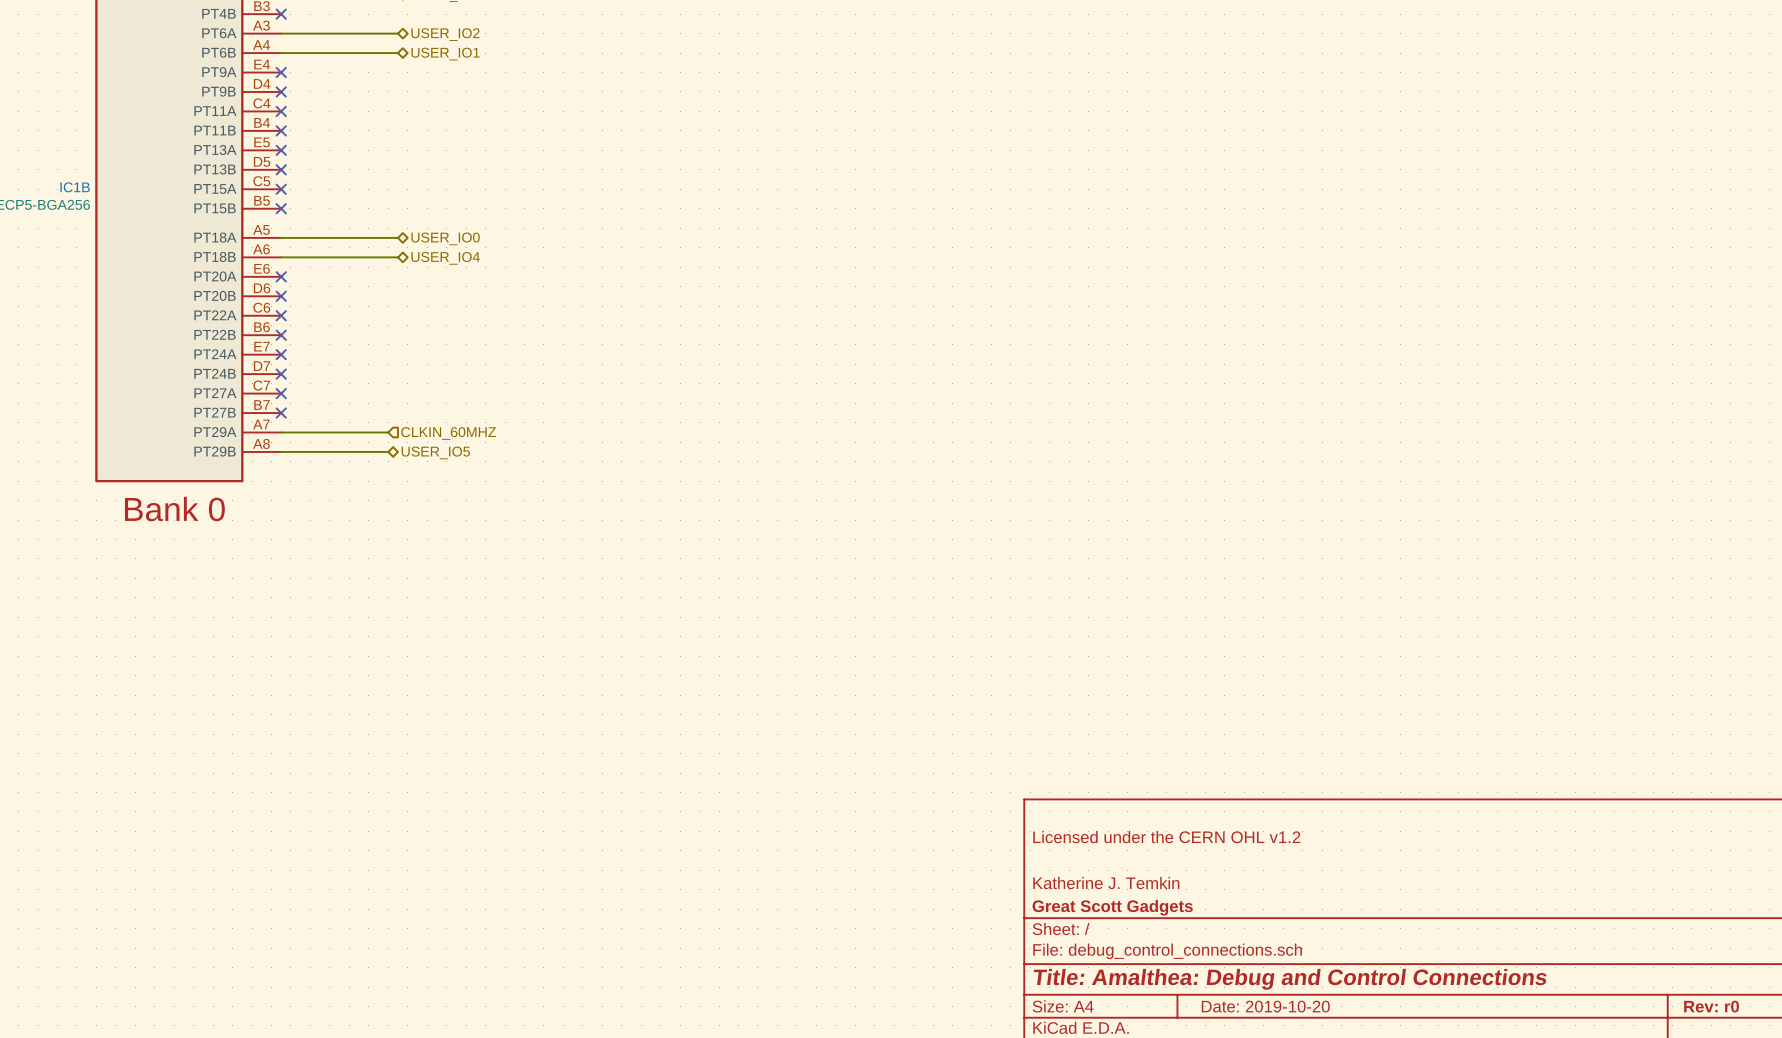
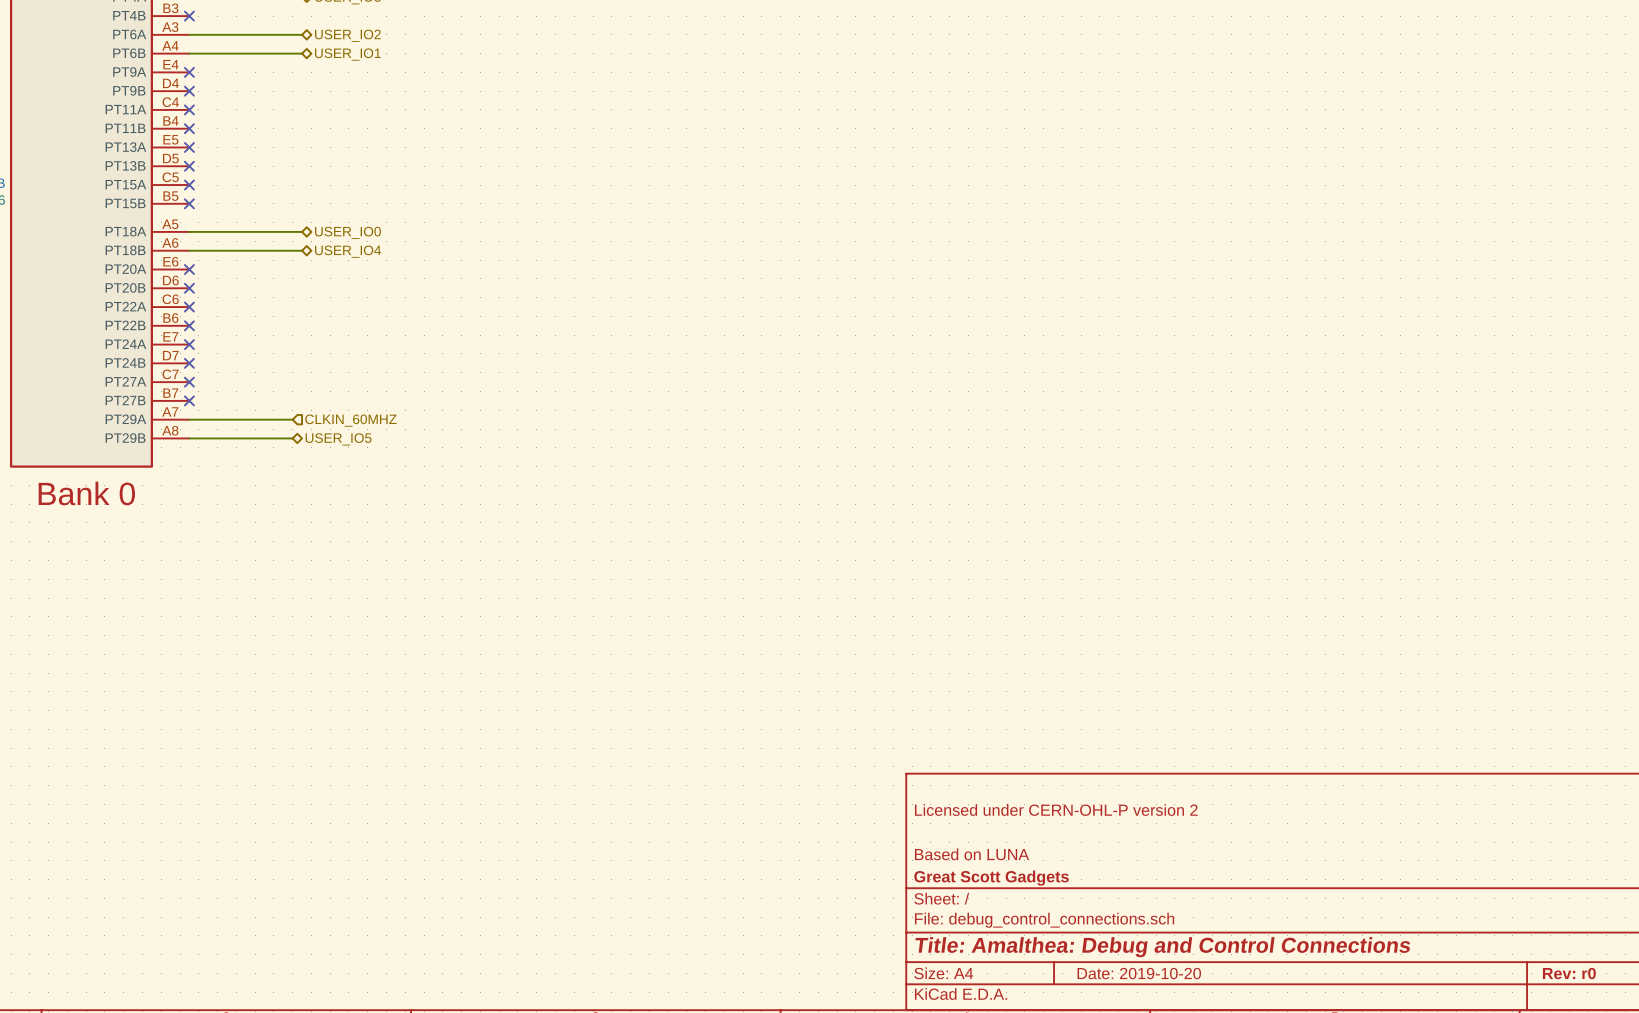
title block: Licensed under the CERN OHL v1.2 (1166, 837) -> Licensed under CERN-OHL-P version 2 (1056, 809)
title block: Katherine J. Temkin (1106, 883) -> Based on LUNA (972, 854)

